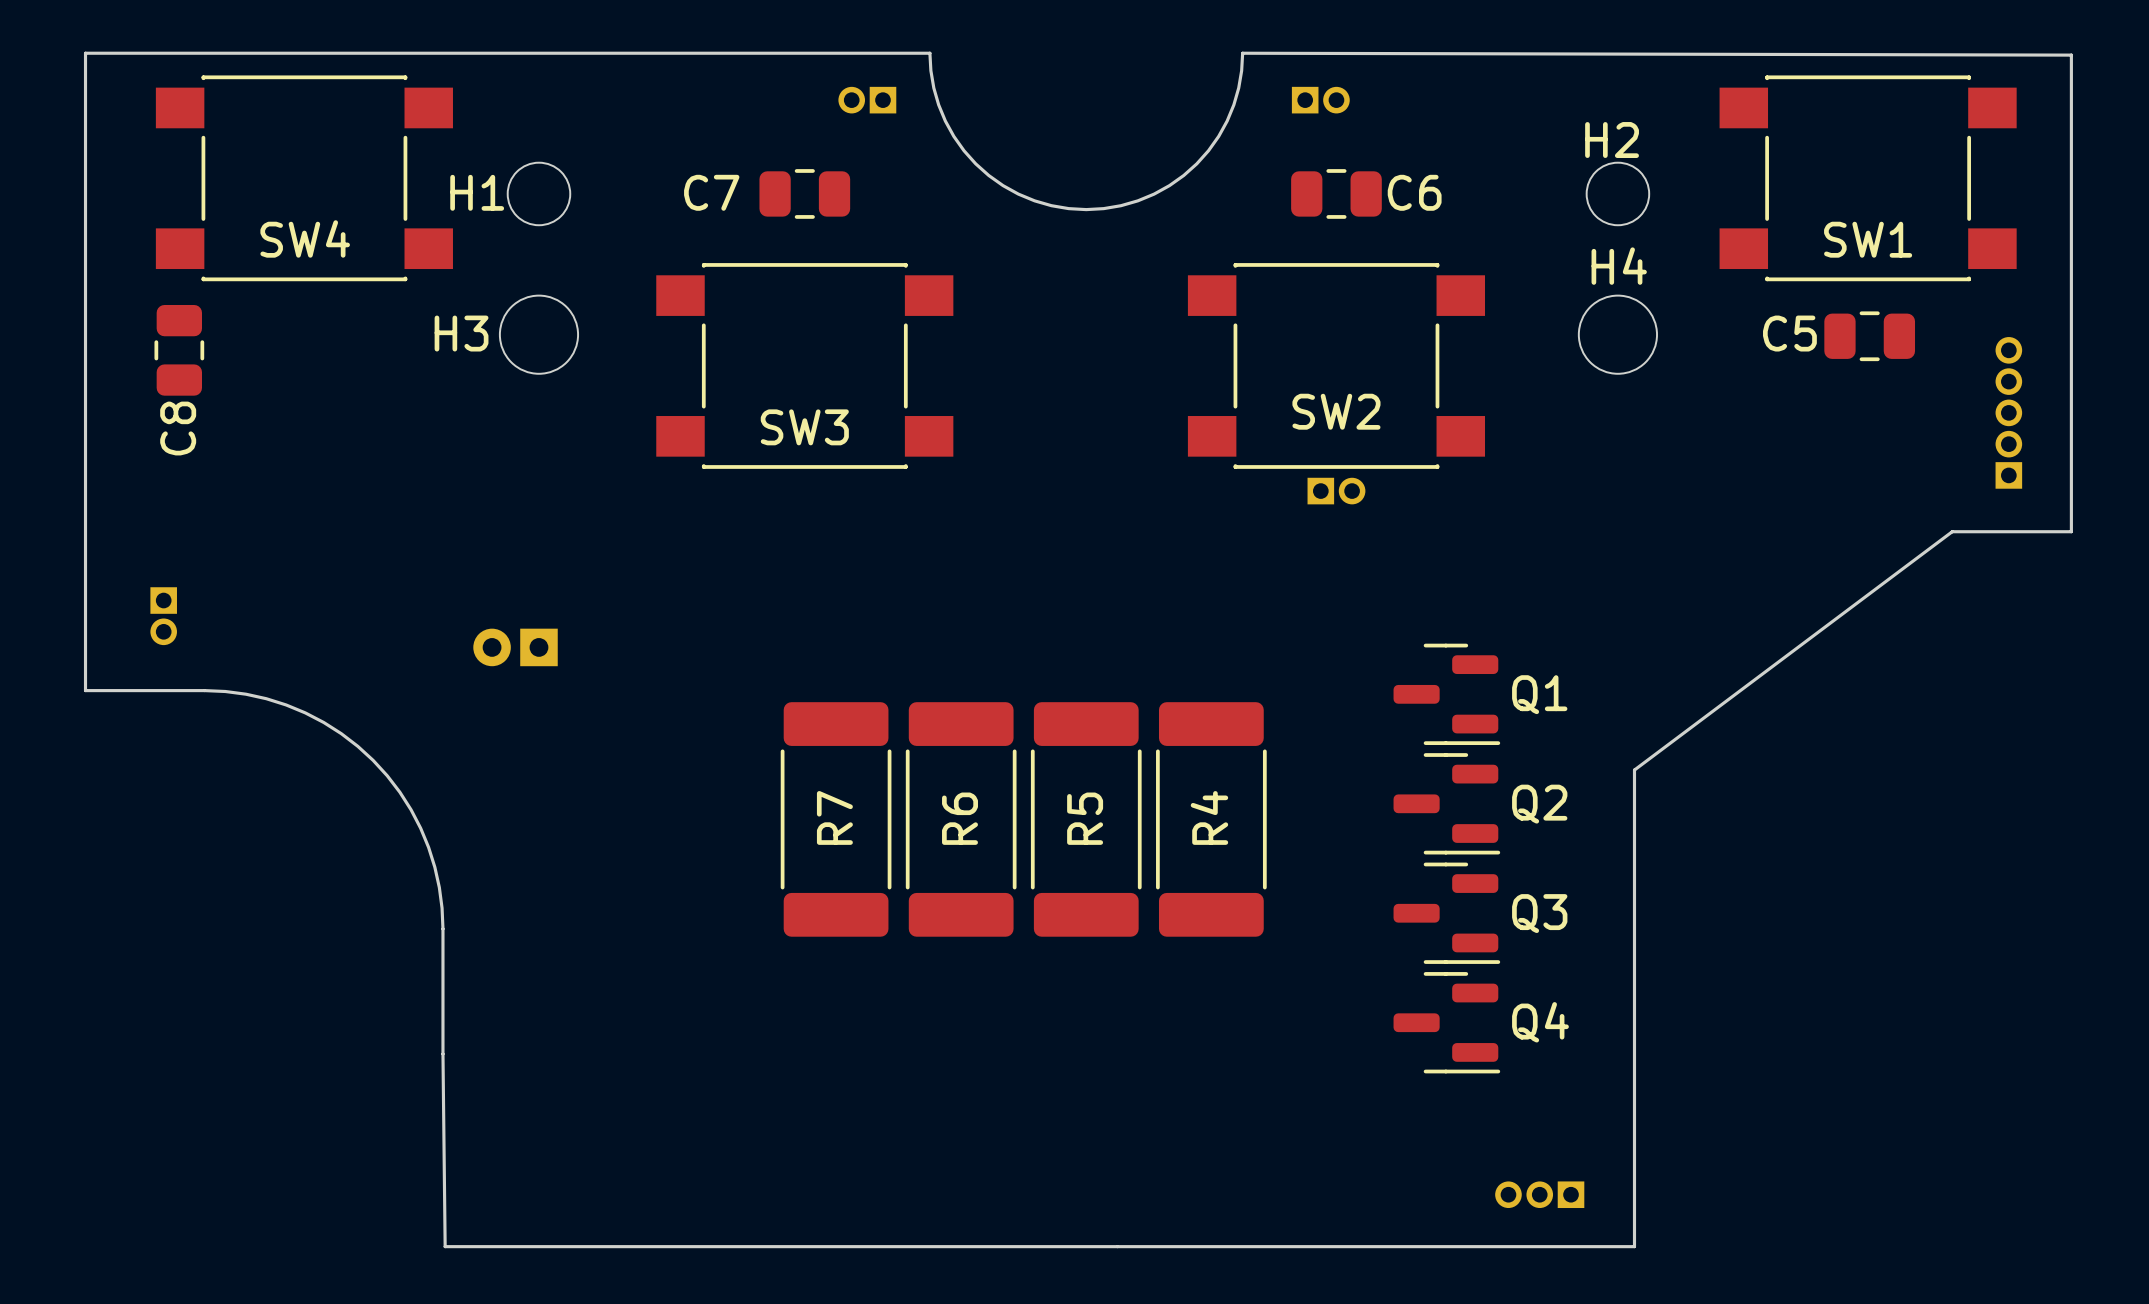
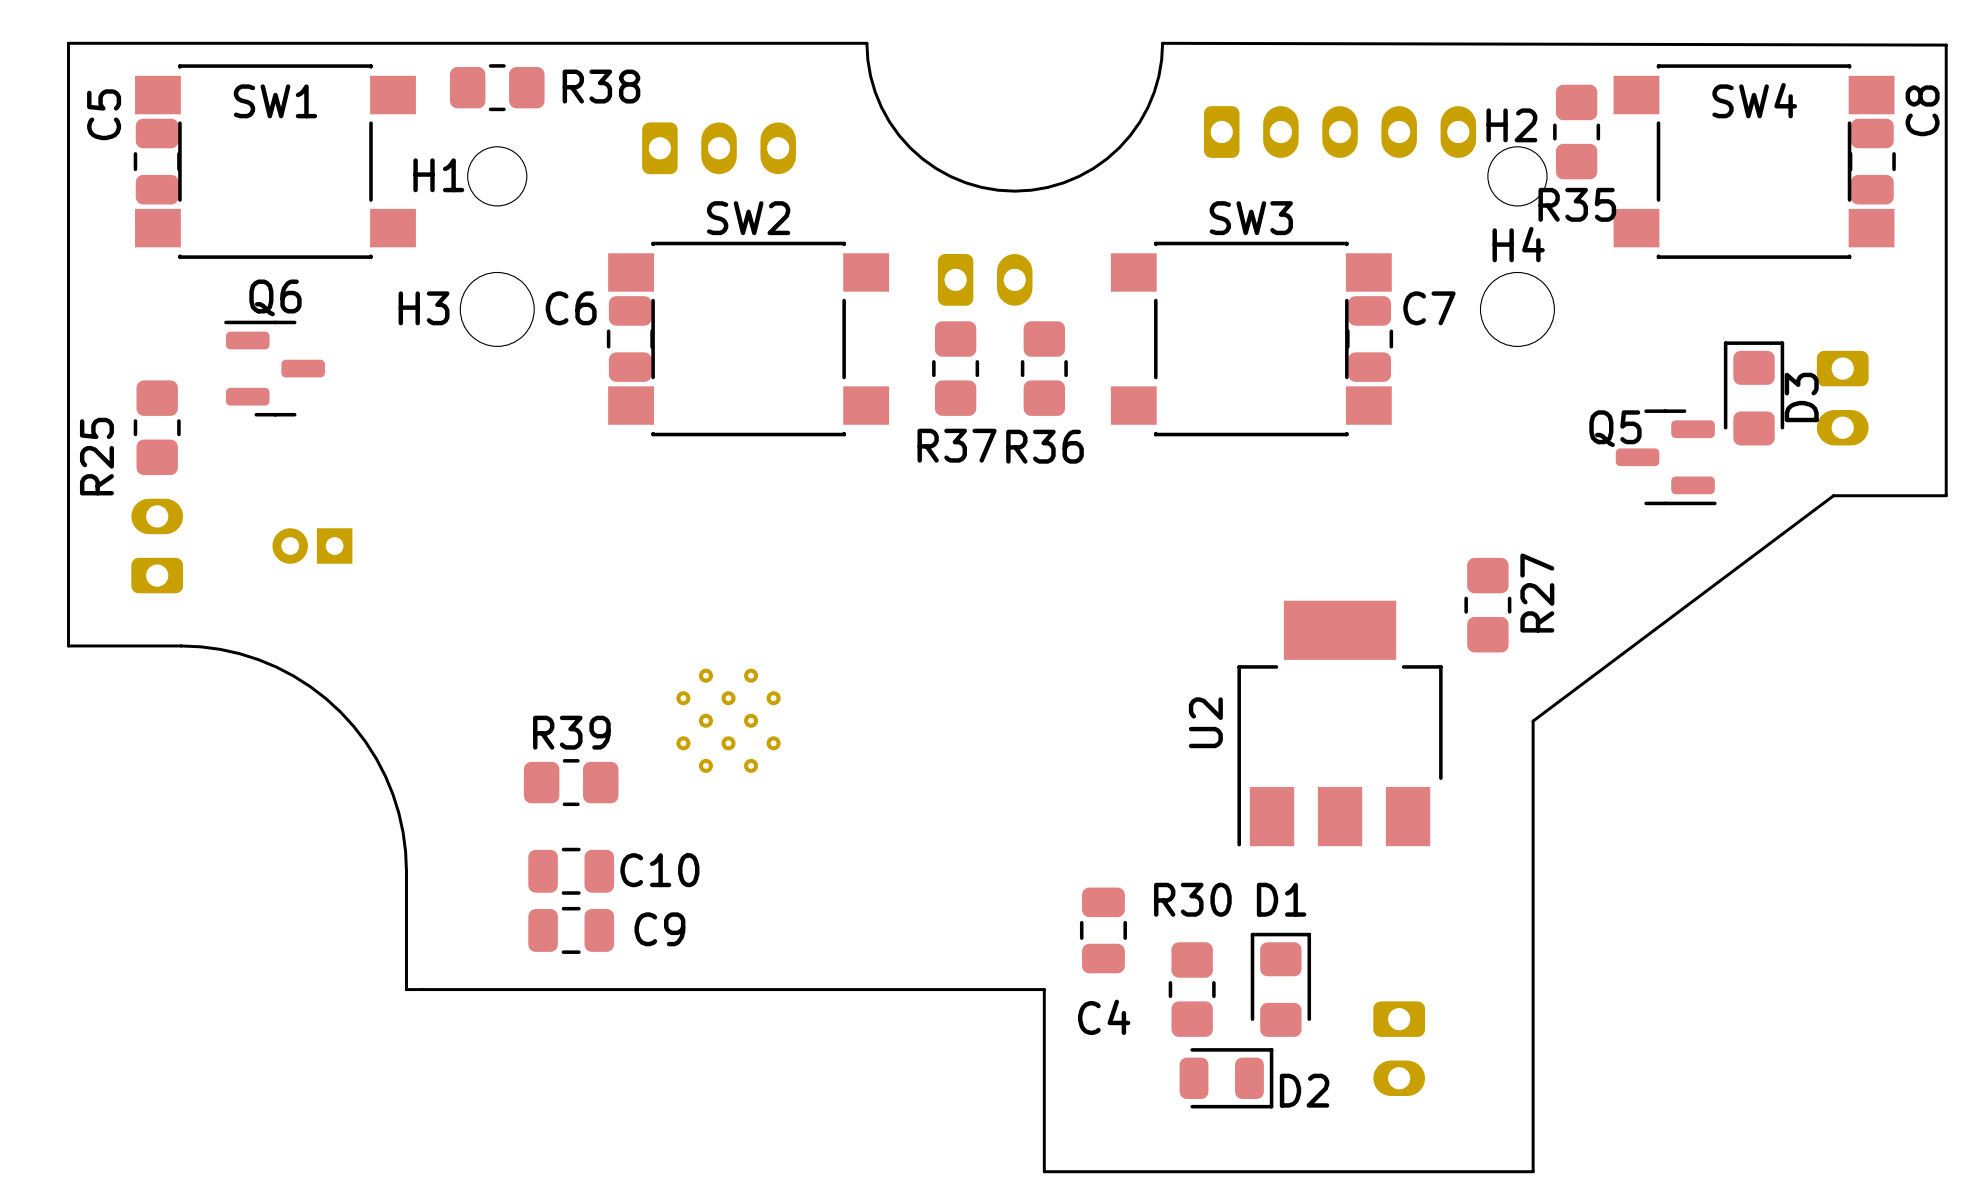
R38: none -> (497, 87)
part: (867, 100) -> none
part: (1320, 100) -> none
part: none -> (1340, 132)
R35: none -> (1576, 132)
part: none -> (719, 148)
C7 name position: C7 (711, 192) -> C7 (1429, 308)
C6 name position: C6 (1414, 192) -> C6 (571, 308)
C7 rotation: 0° (804, 193) -> 90° clockwise (1369, 339)
C7 position: (804, 193) -> (1369, 339)
C6 rotation: 0° (1336, 193) -> 90° clockwise (630, 339)
C6 position: (1336, 193) -> (630, 339)
SW4 name: SW4 (305, 238) -> SW1 (275, 101)
SW1 name: SW1 (1868, 239) -> SW4 (1754, 100)
part: none -> (985, 279)
C5 rotation: 0° (1869, 336) -> 90° clockwise (157, 161)
C5 position: (1869, 336) -> (157, 161)
C8 position: (179, 350) -> (1872, 161)
Q6: none -> (274, 368)
R37: none -> (955, 368)
R36: none -> (1044, 368)
SW2 name: SW2 (1336, 411) -> SW3 (1251, 218)
part: (2008, 412) -> none
D3: none -> (1754, 393)
SW3 name: SW3 (804, 427) -> SW2 (748, 218)
C8 name position: C8 (178, 428) -> C8 (1922, 110)
part: none -> (1842, 398)
R25: none -> (157, 427)
part: (1336, 491) -> none
Q5: none -> (1666, 457)
part: none -> (157, 546)
part: (163, 616) -> none
part position: (515, 647) -> (312, 546)
R27: none -> (1487, 605)
Q1: (1446, 694) -> none
part: none -> (728, 720)
U2: none -> (1340, 723)
Q2: (1446, 803) -> none
R7: (836, 819) -> none
R6: (961, 819) -> none
R5: (1086, 819) -> none
R4: (1211, 819) -> none
R39: none -> (571, 782)
Q3: (1446, 913) -> none
C10: none -> (571, 871)
C9: none -> (571, 930)
C4: none -> (1103, 930)
Q4: (1446, 1022) -> none
D1: none -> (1280, 984)
board edge: (442, 1053) (445, 1246) (1117, 1246) -> (406, 989) (1044, 989) (1044, 1171)
R30: none -> (1192, 989)
part: none -> (1399, 1048)
D2: none -> (1226, 1078)
part: (1539, 1194) -> none

